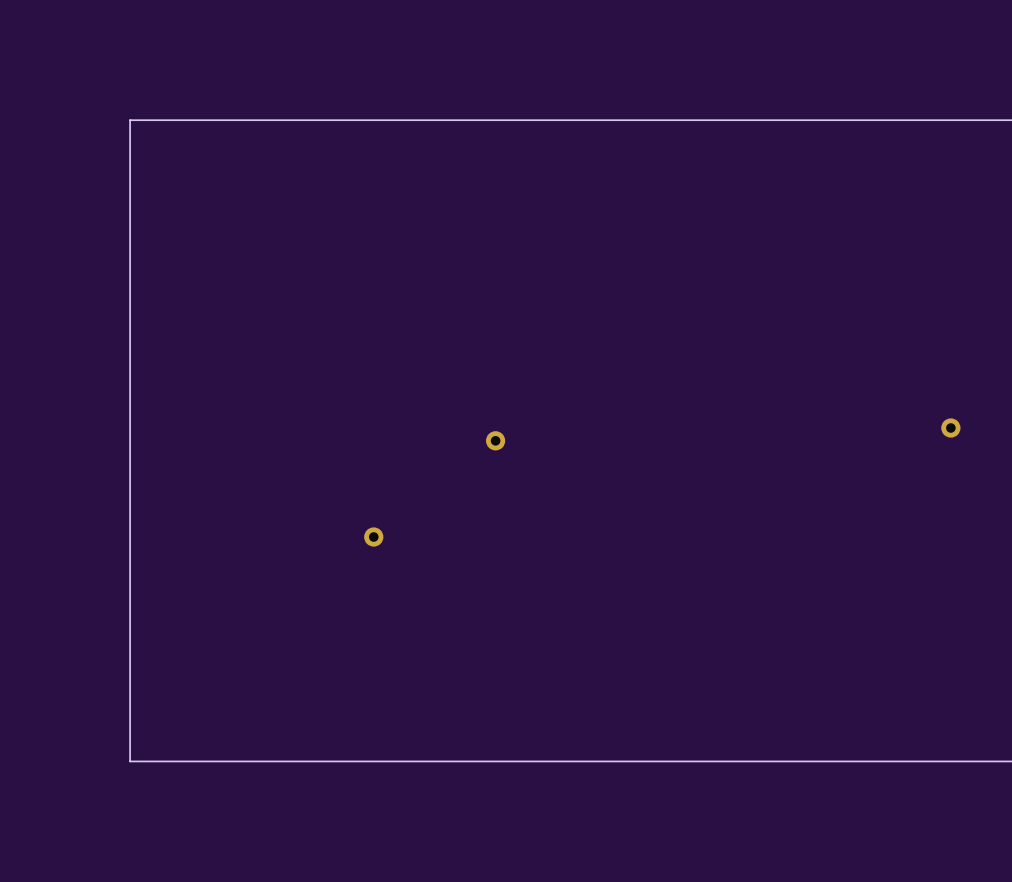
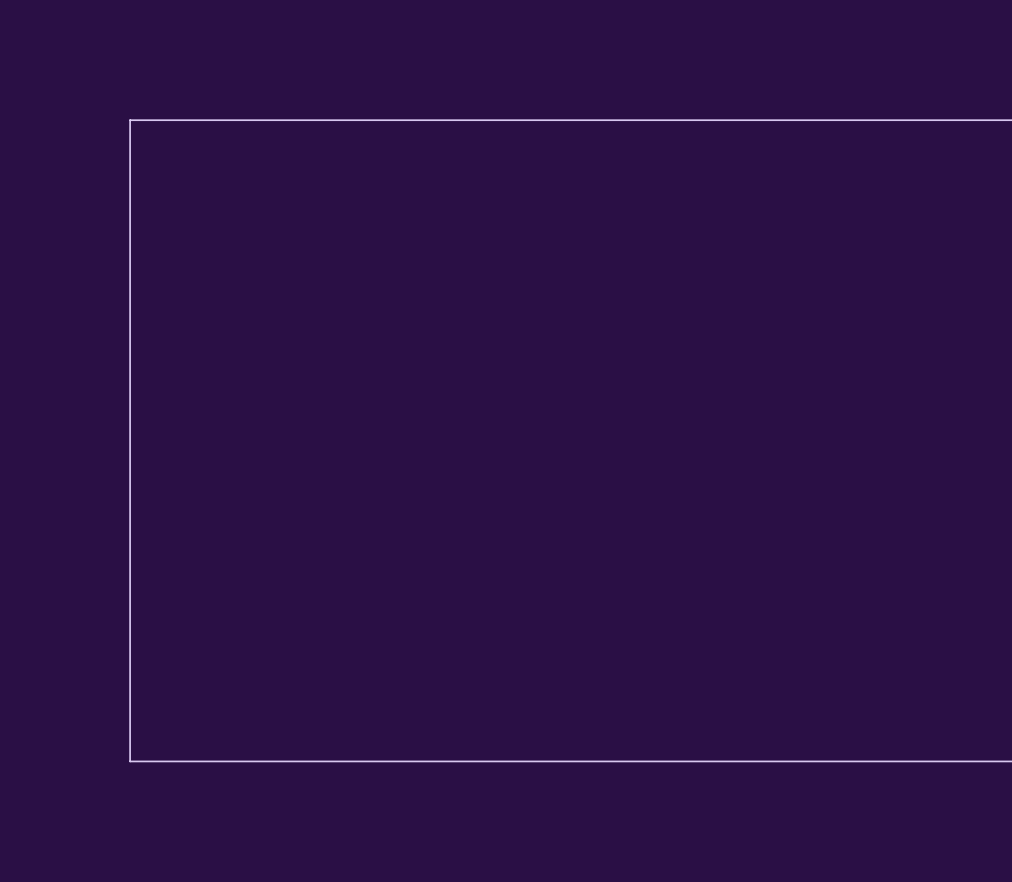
via: (950, 427) -> none
via: (495, 440) -> none
via: (373, 537) -> none

